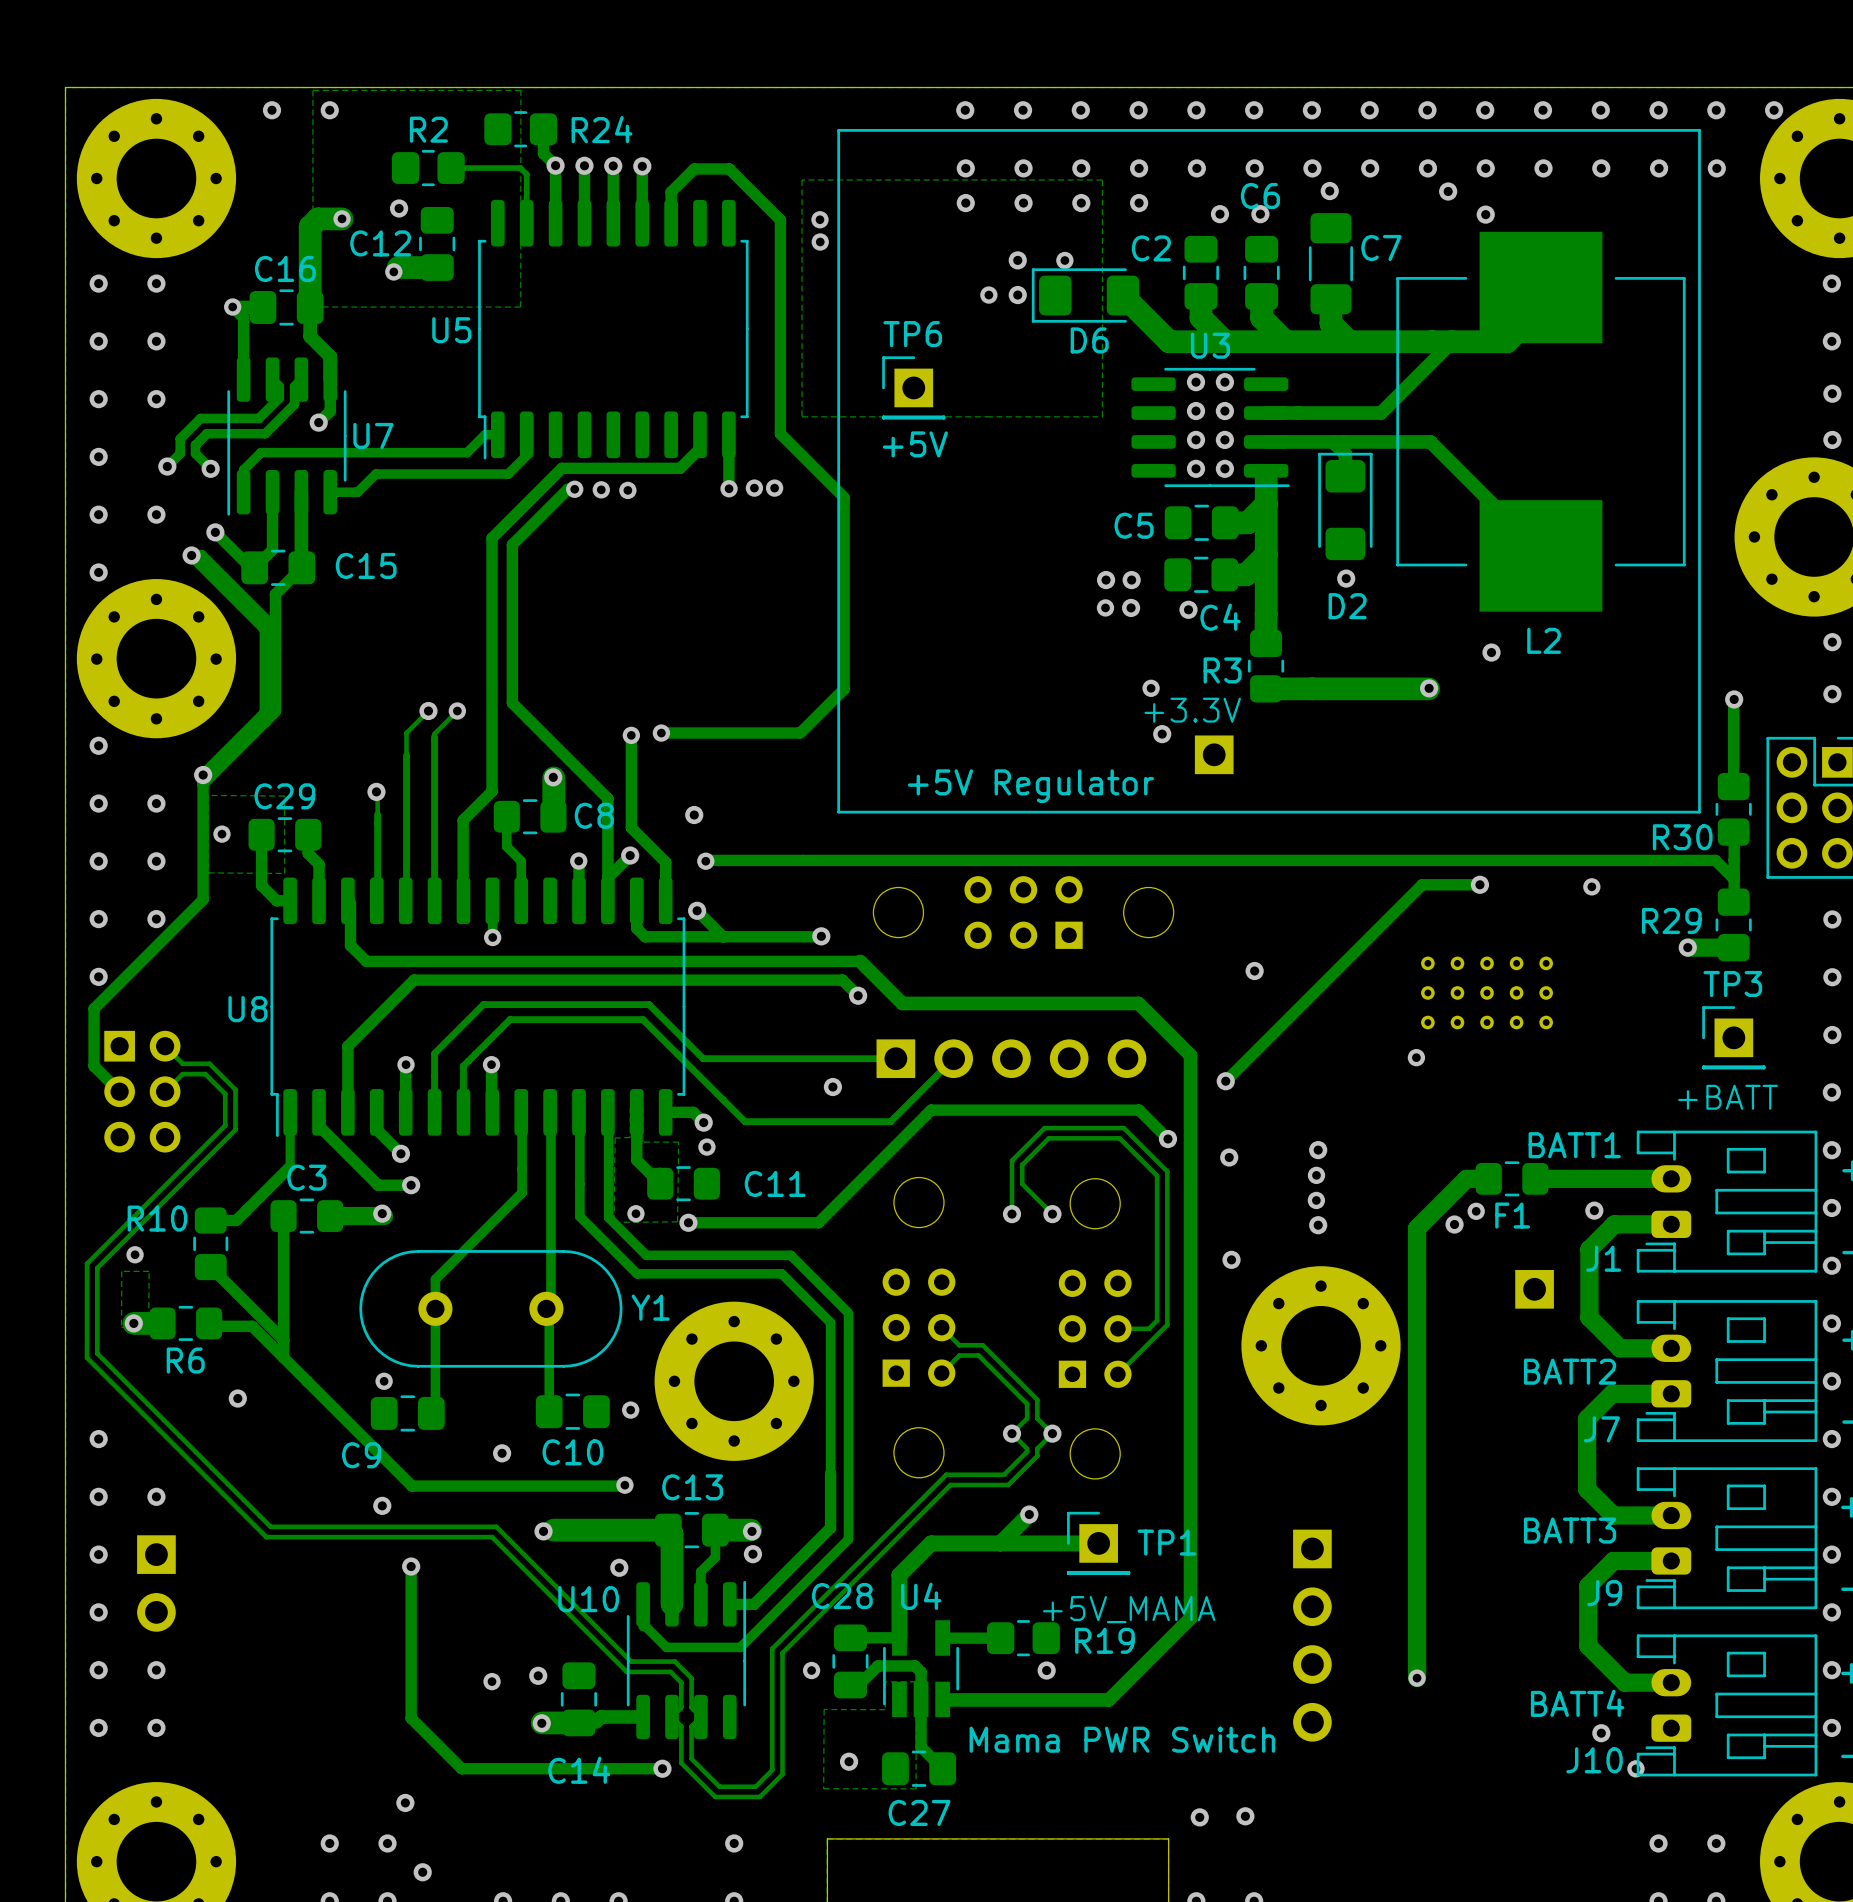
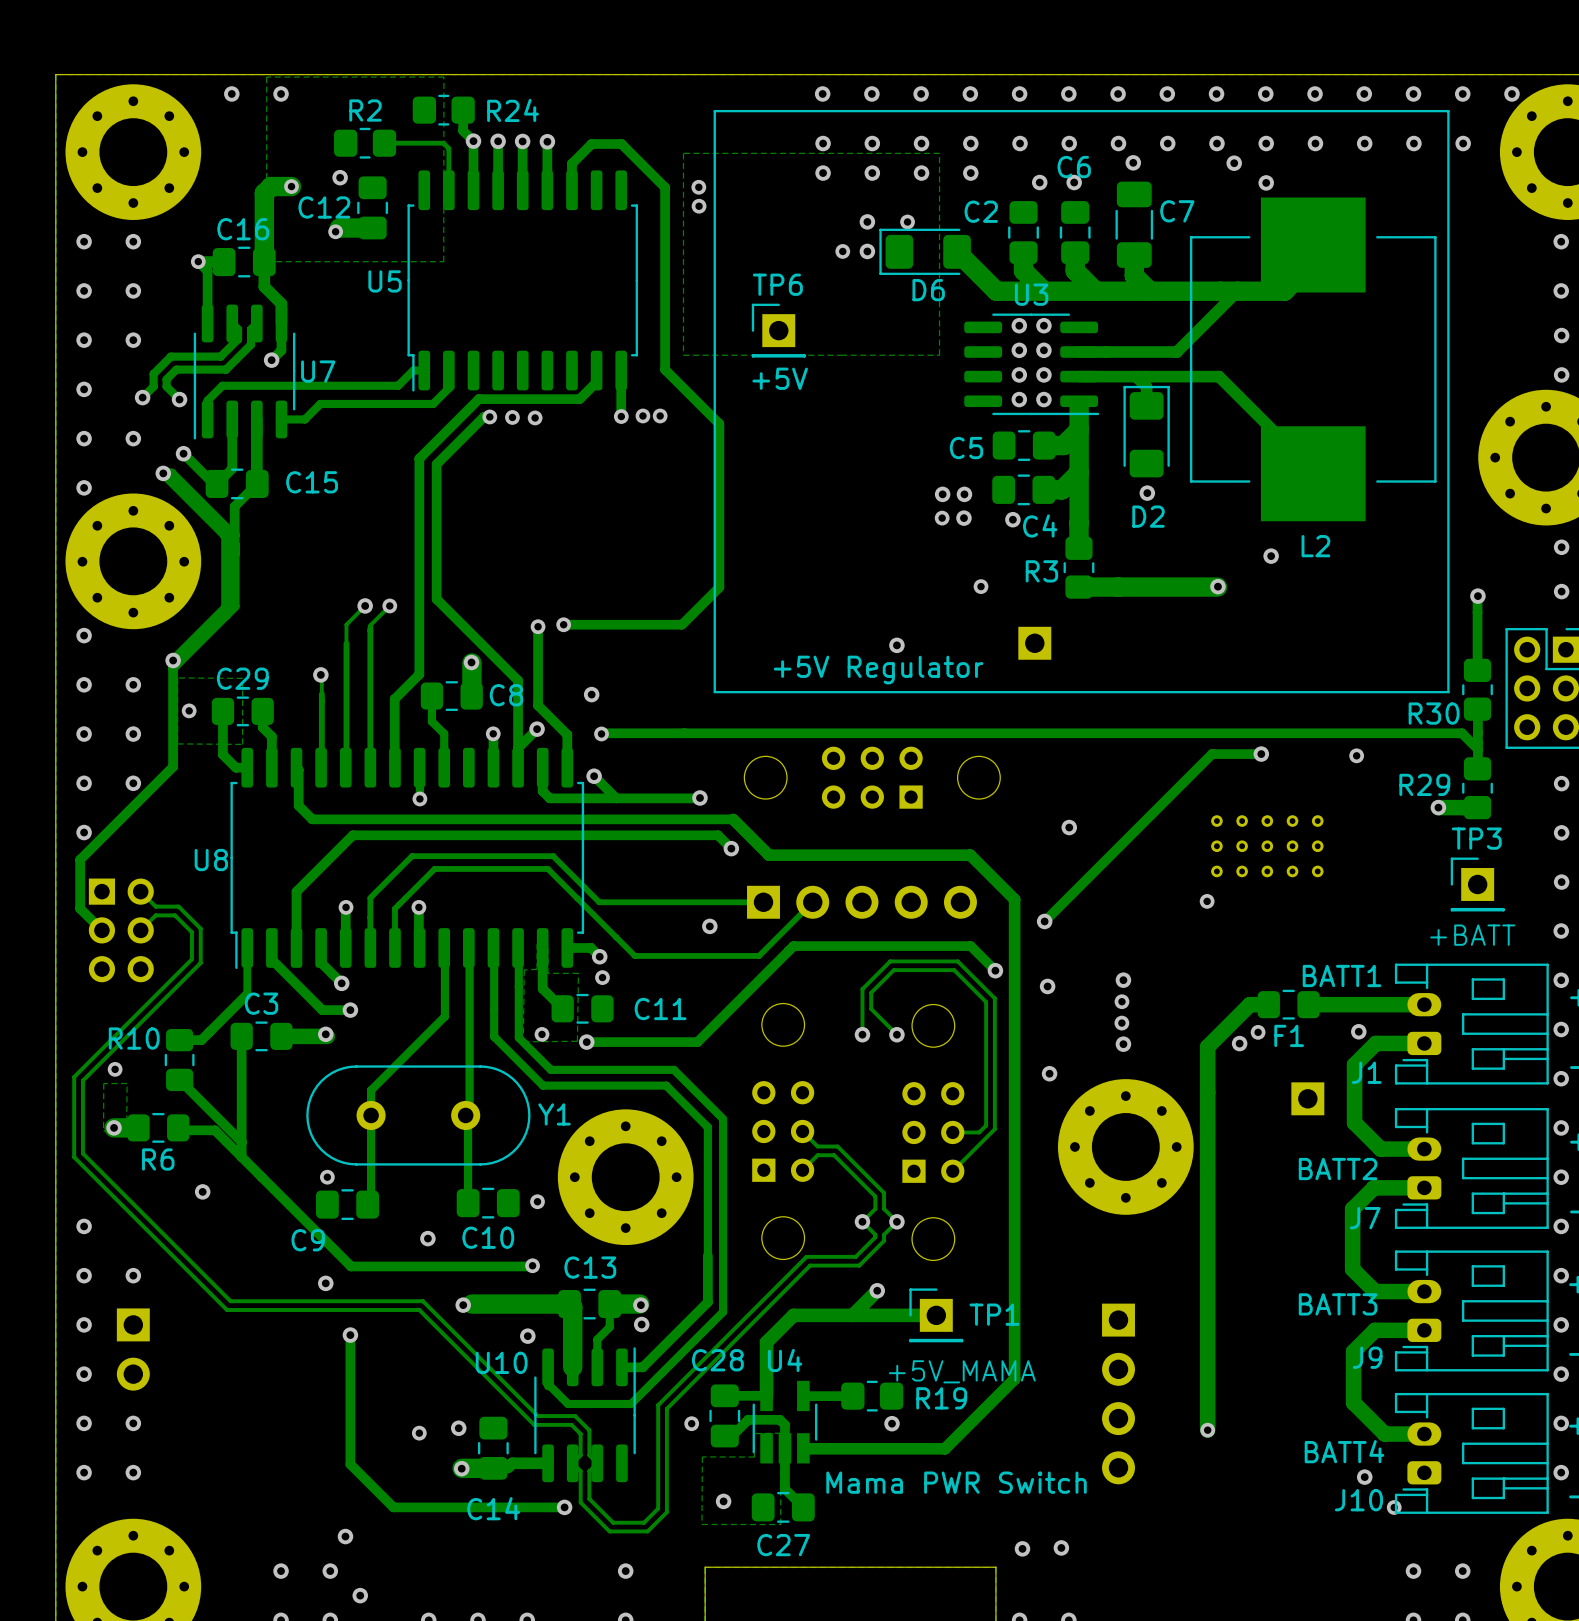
text: +3.3V (1192, 710) -> none
via position: (1162, 734) -> (896, 645)

